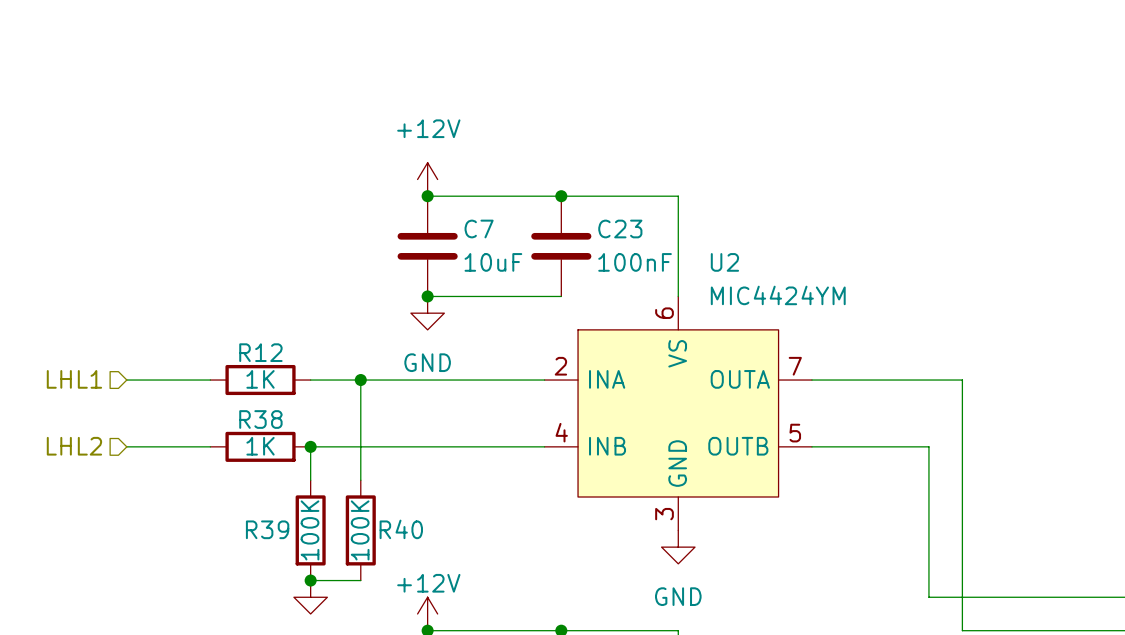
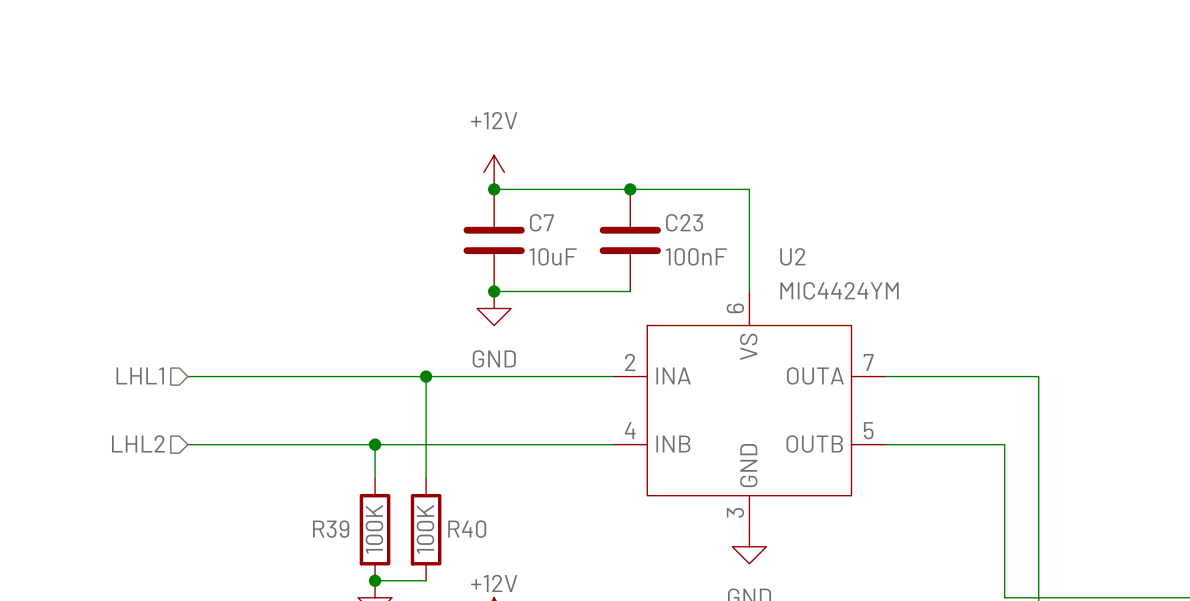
wire: none -> (272, 376) (375, 376)
R12: 1K (260, 380) -> none
wire: none -> (272, 444) (375, 444)
R38: 1K (260, 446) -> none

